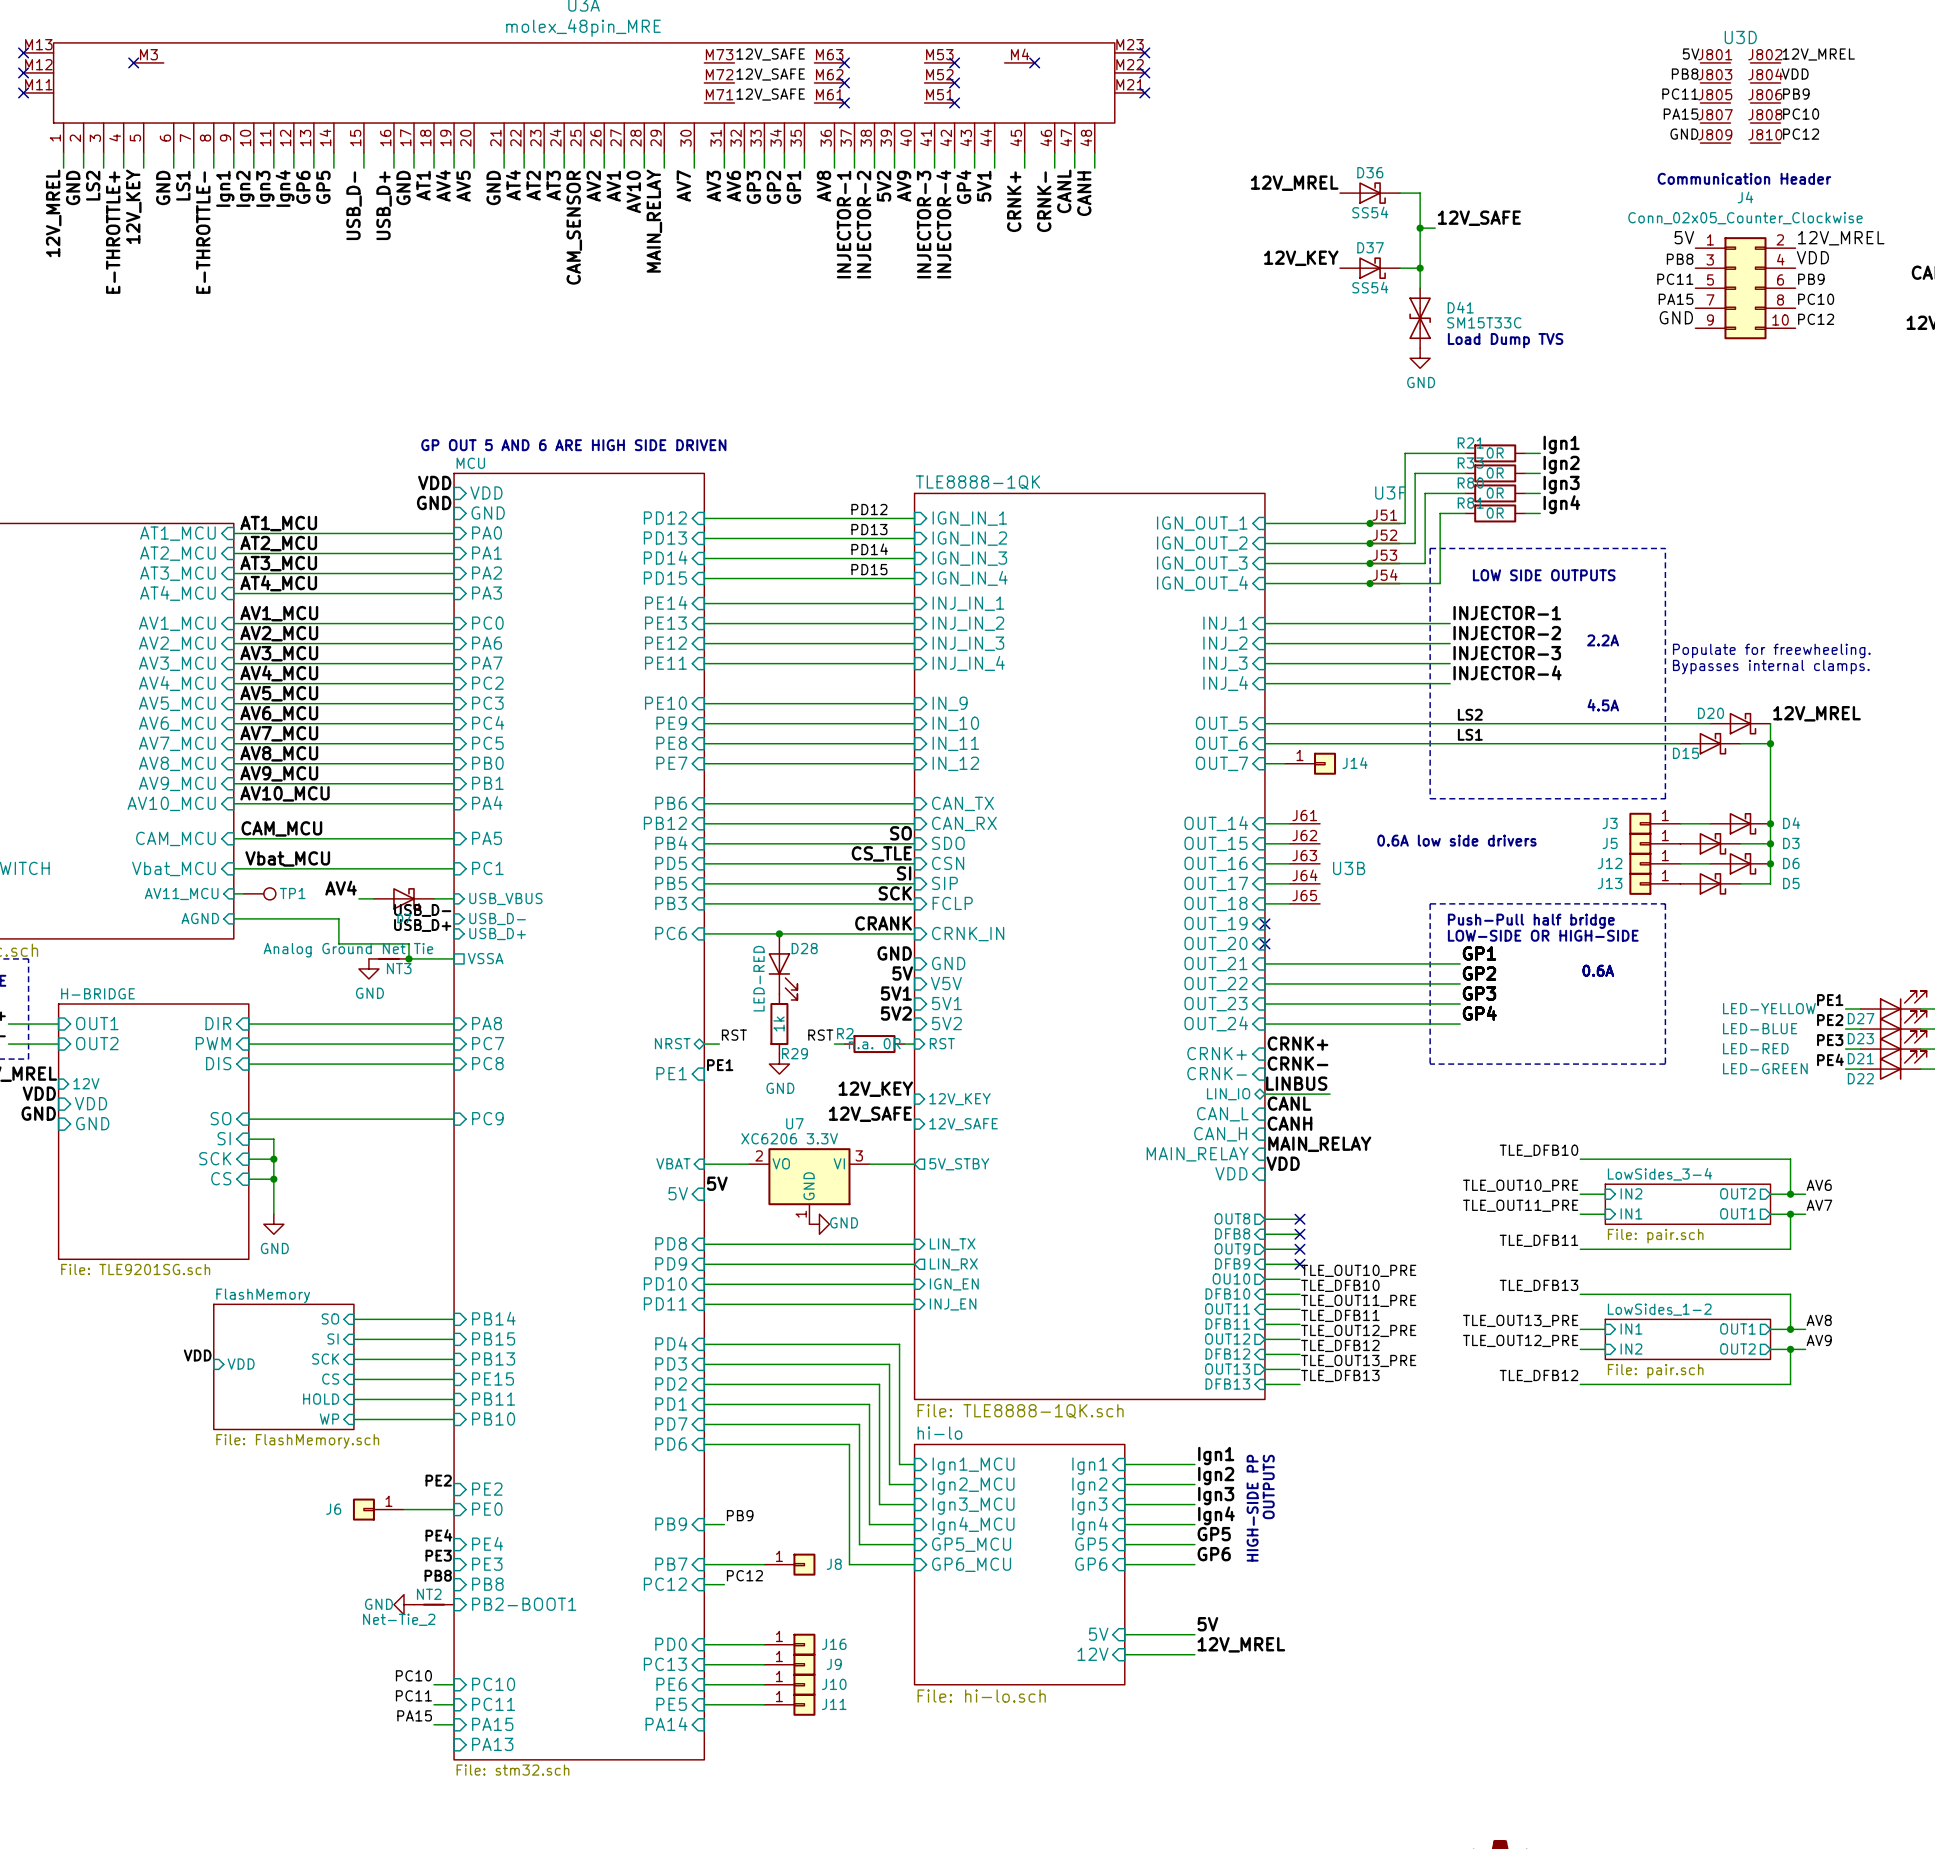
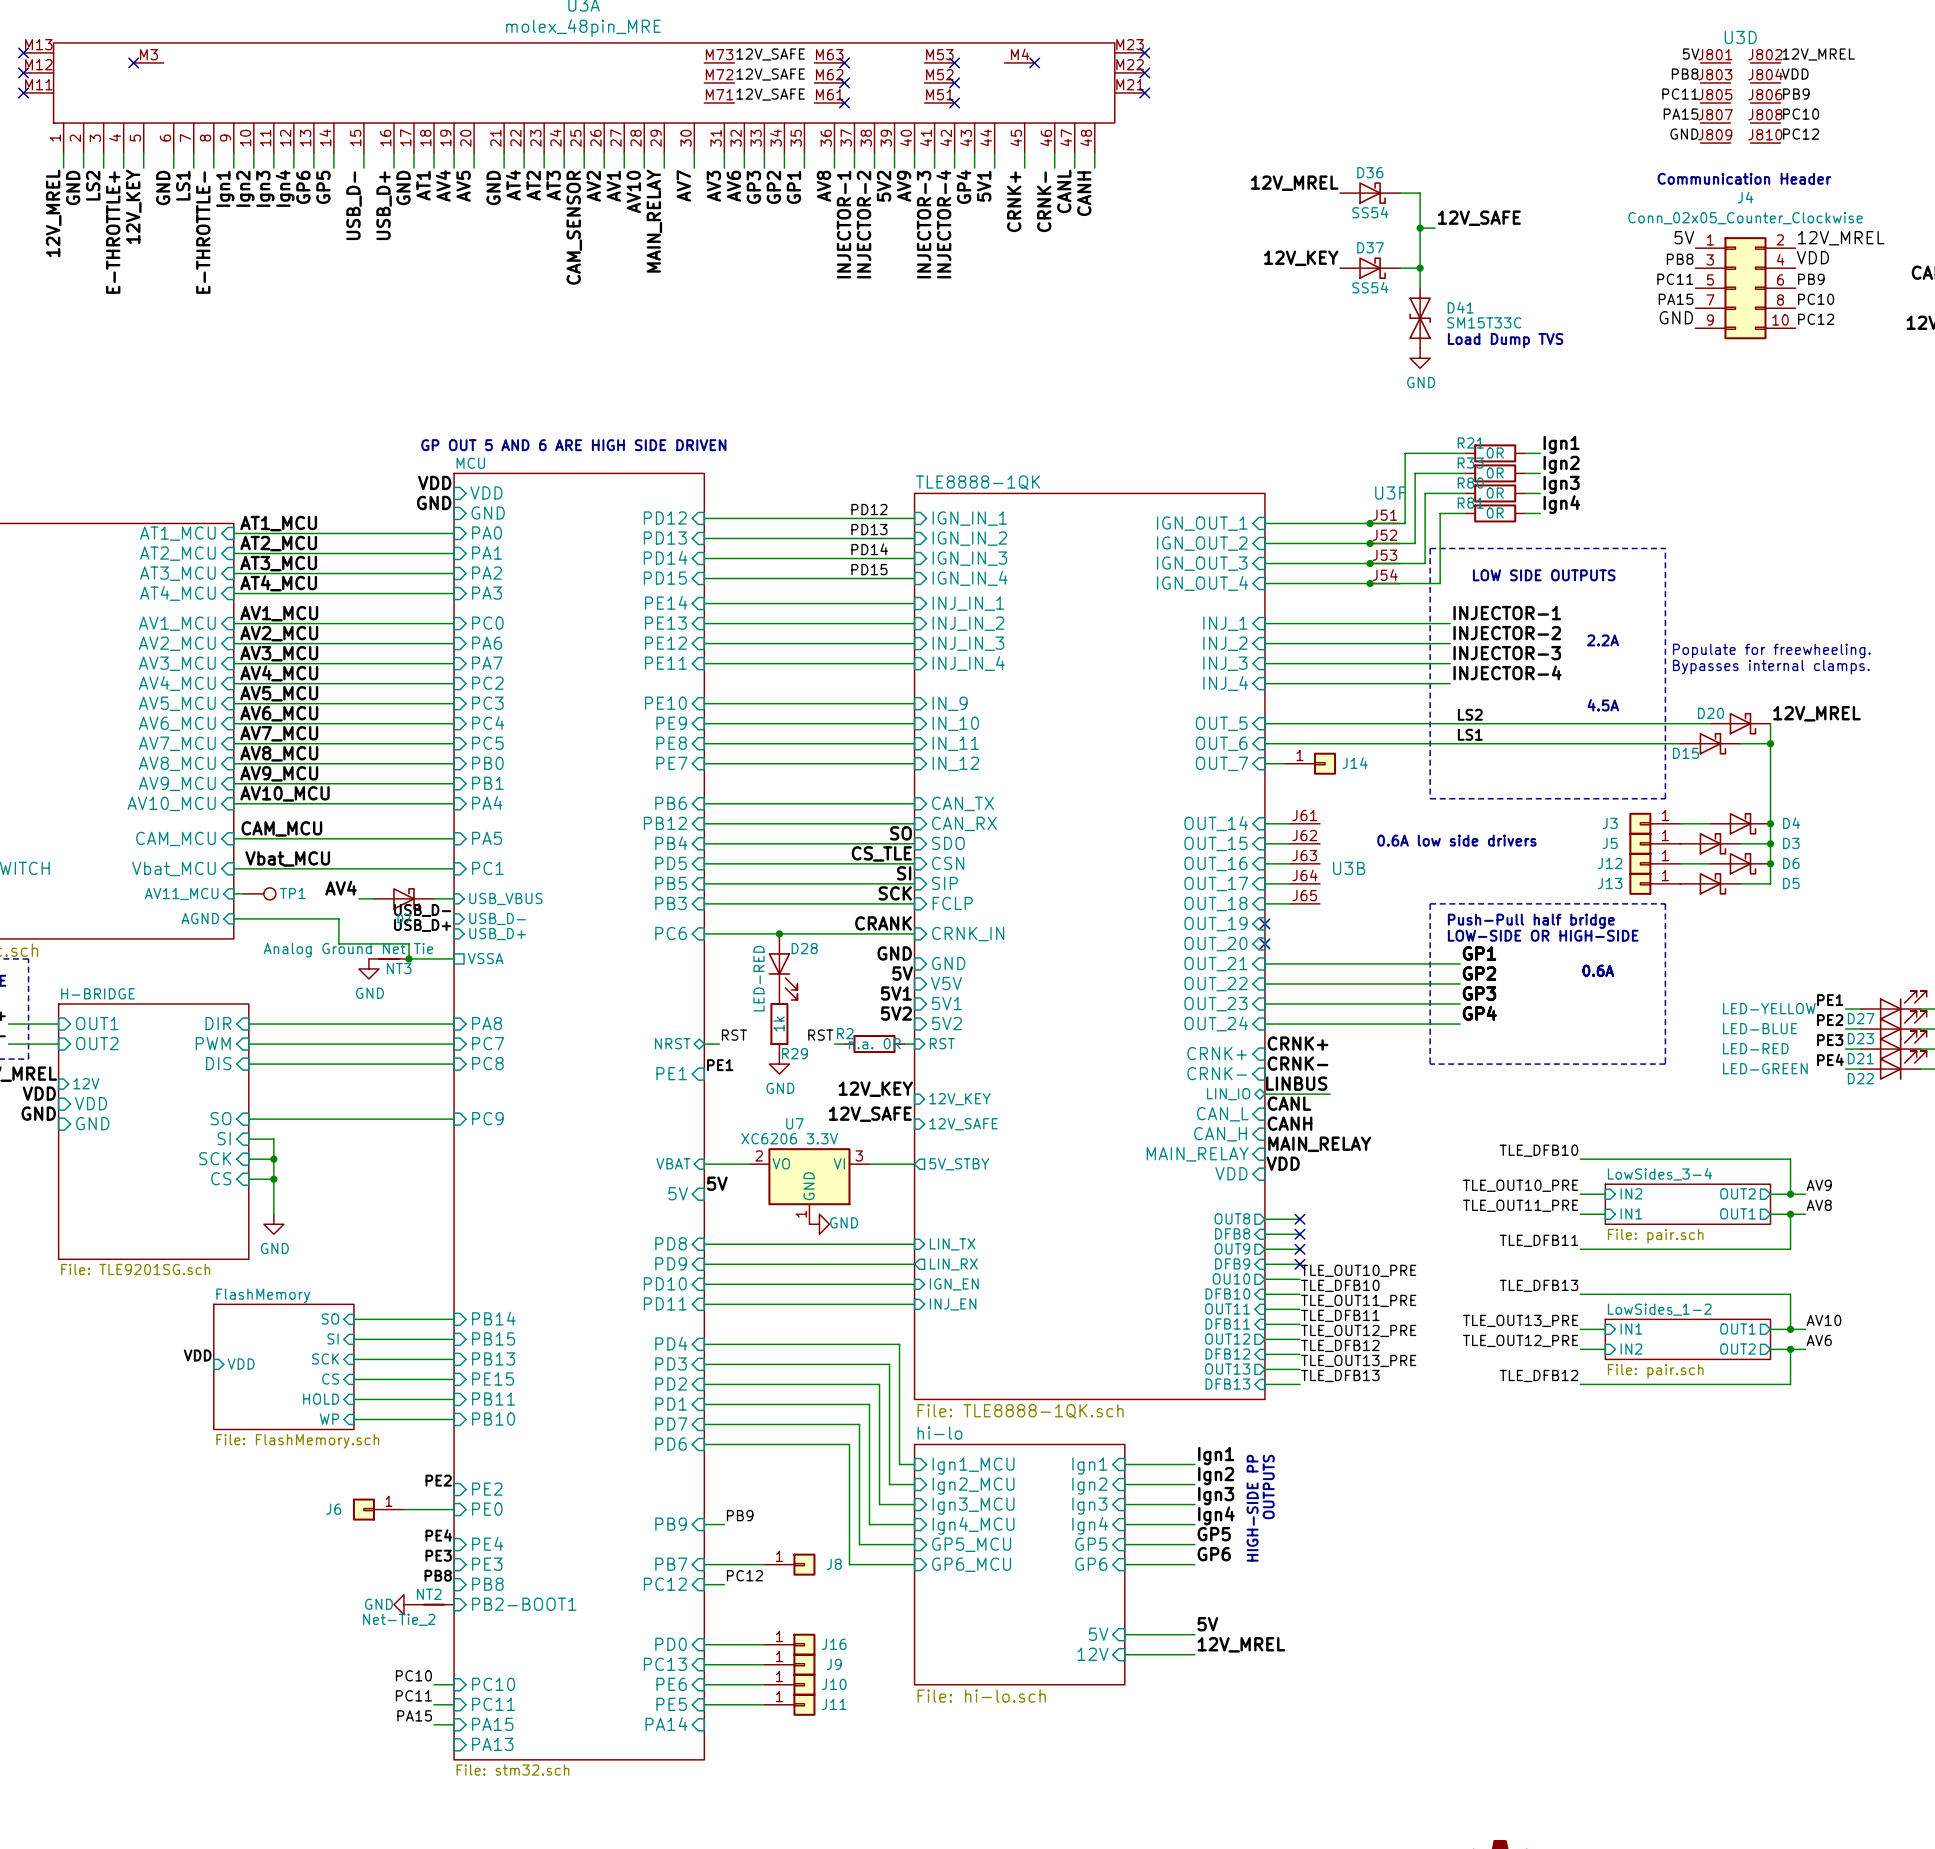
label: AV6 (1819, 1185) -> AV9 (1819, 1185)
label: AV7 (1819, 1205) -> AV8 (1819, 1205)
label: AV8 (1819, 1320) -> AV10 (1823, 1320)
label: AV9 (1819, 1340) -> AV6 (1819, 1340)

